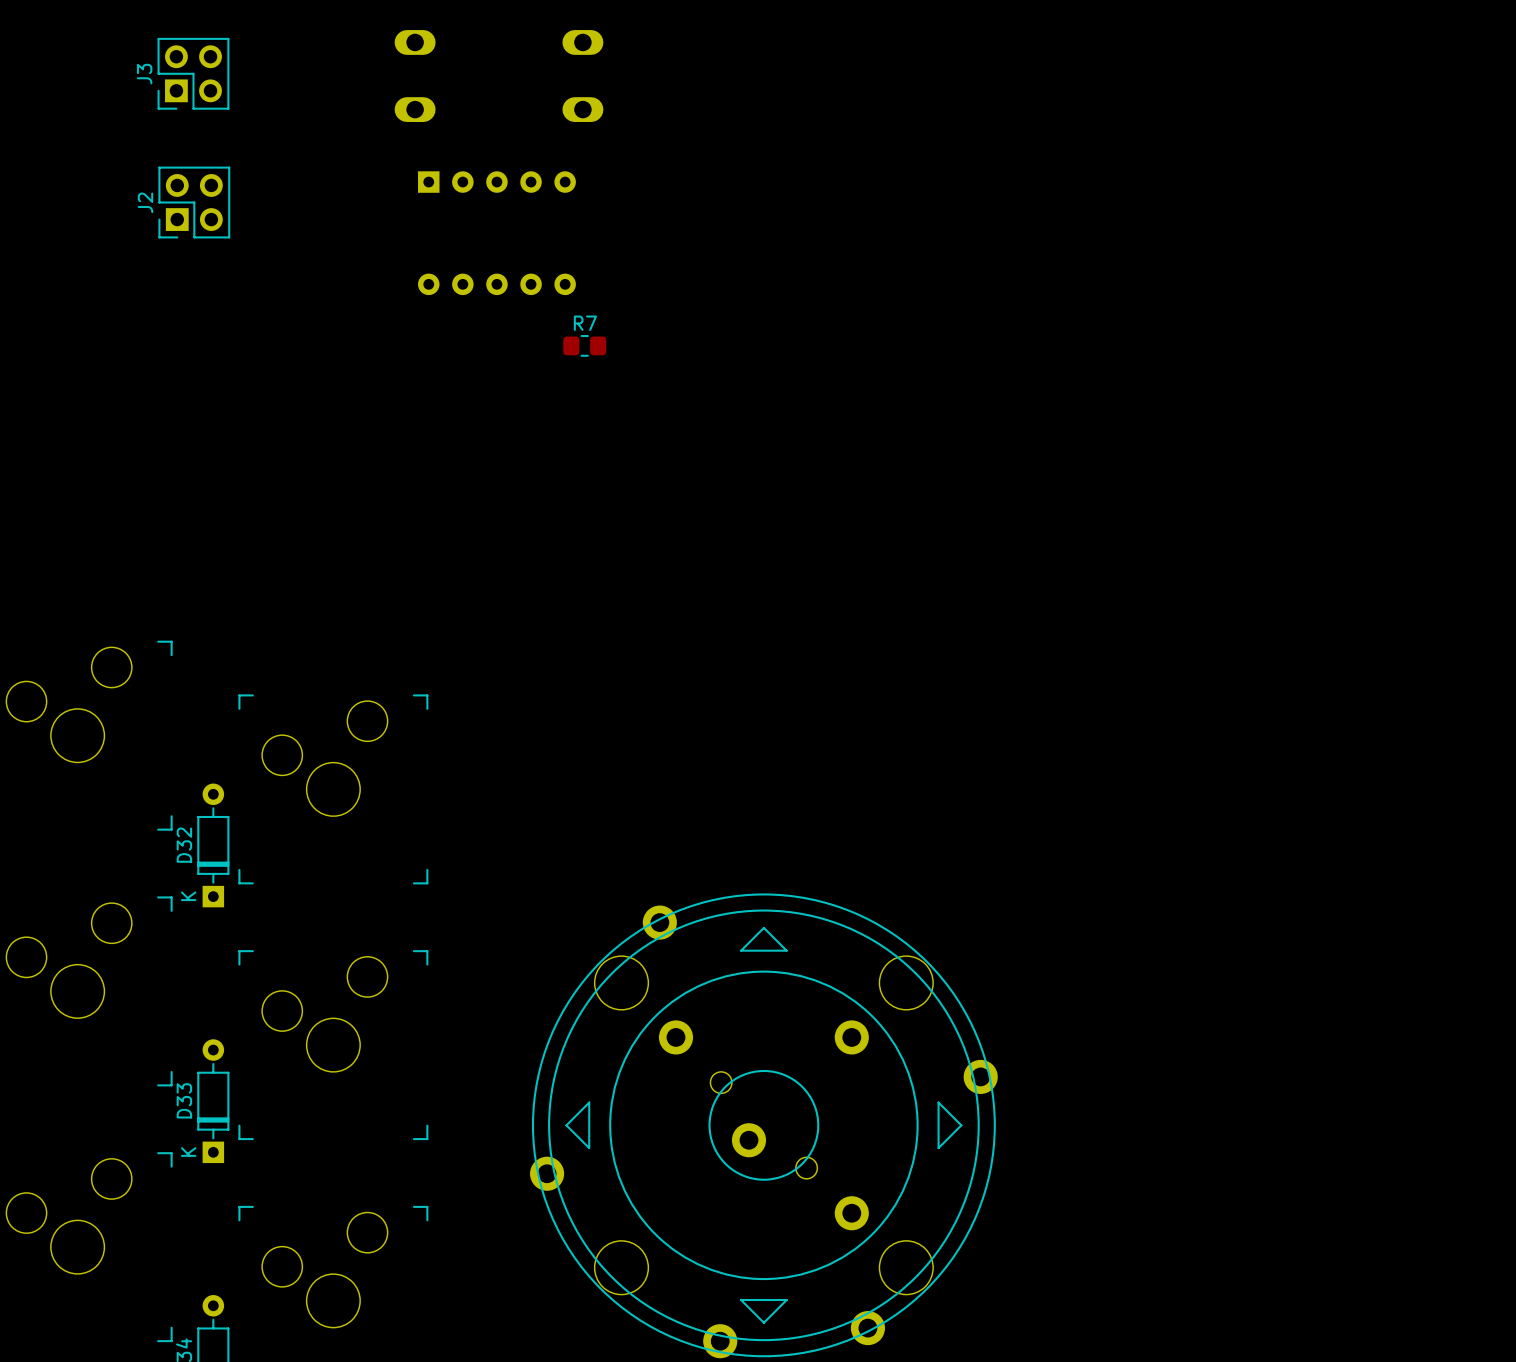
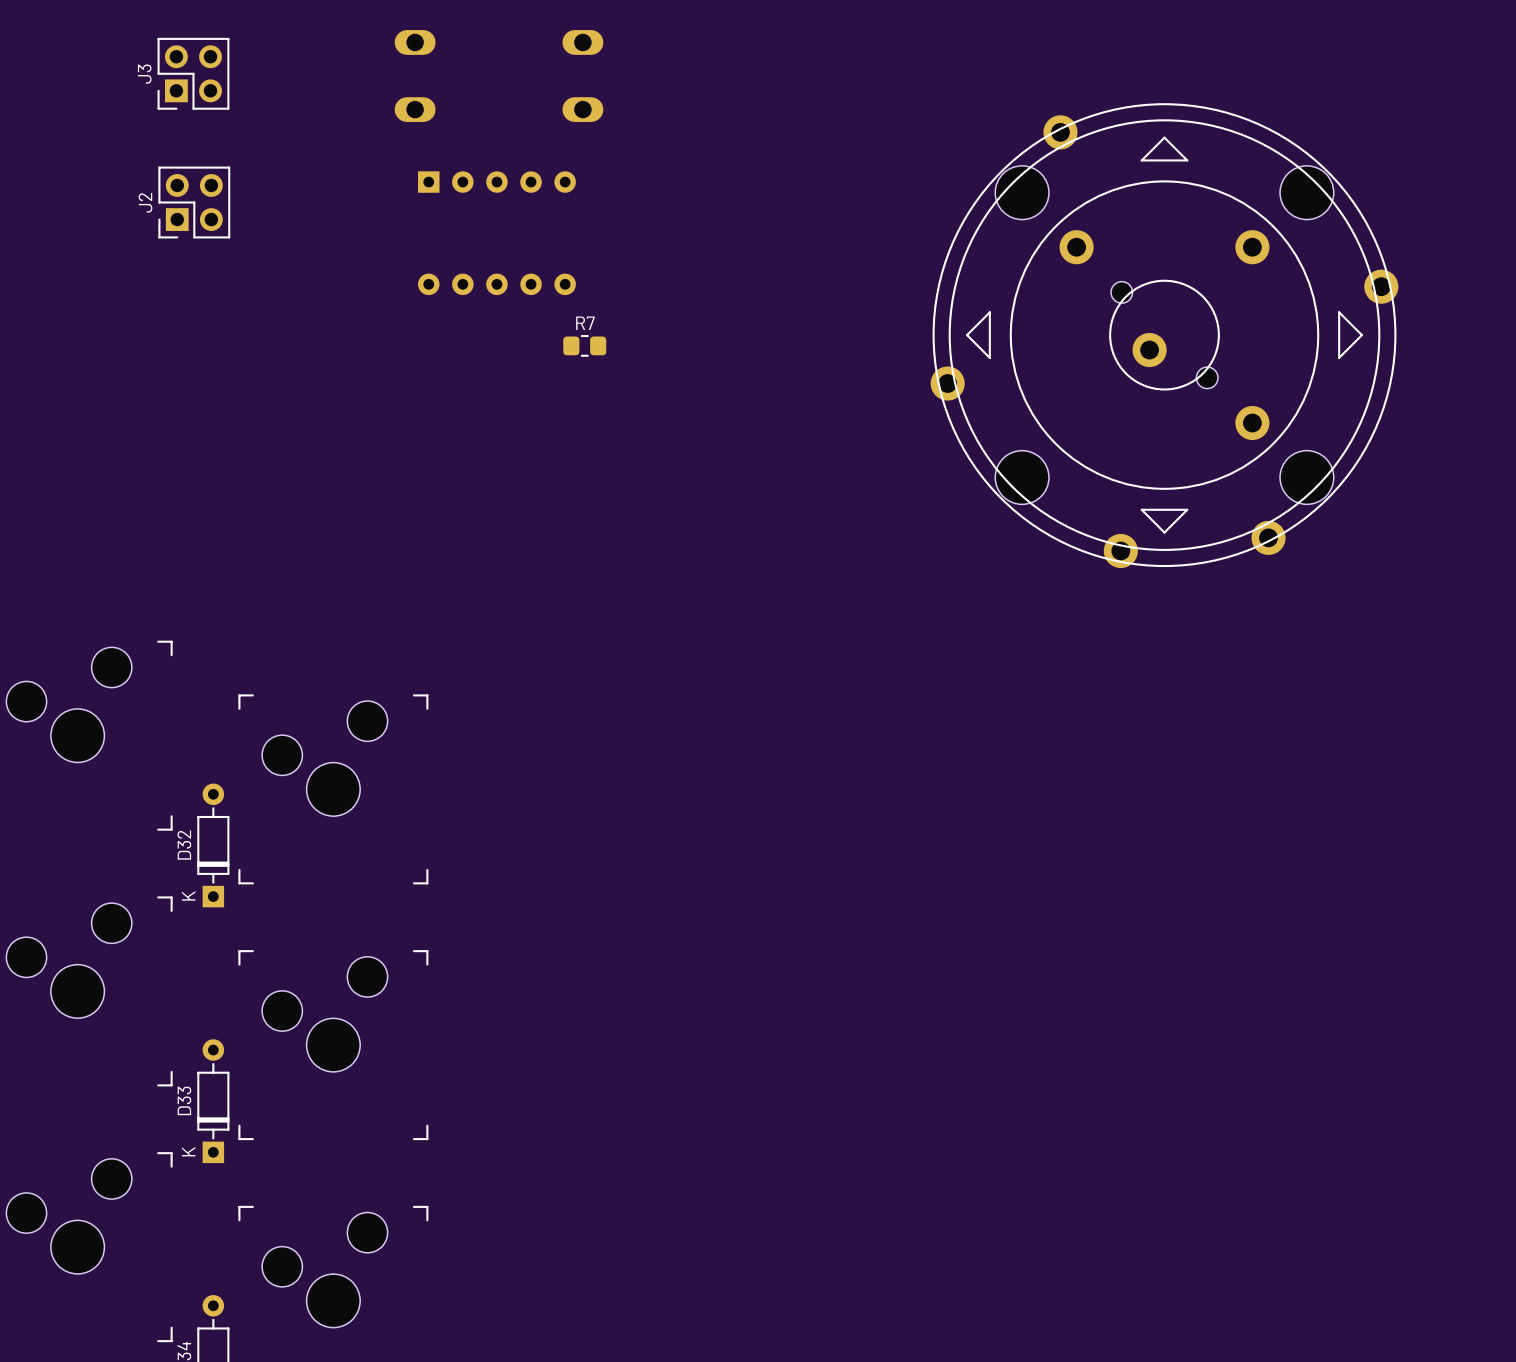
part: none -> (1164, 335)
part: (763, 1125) -> none

